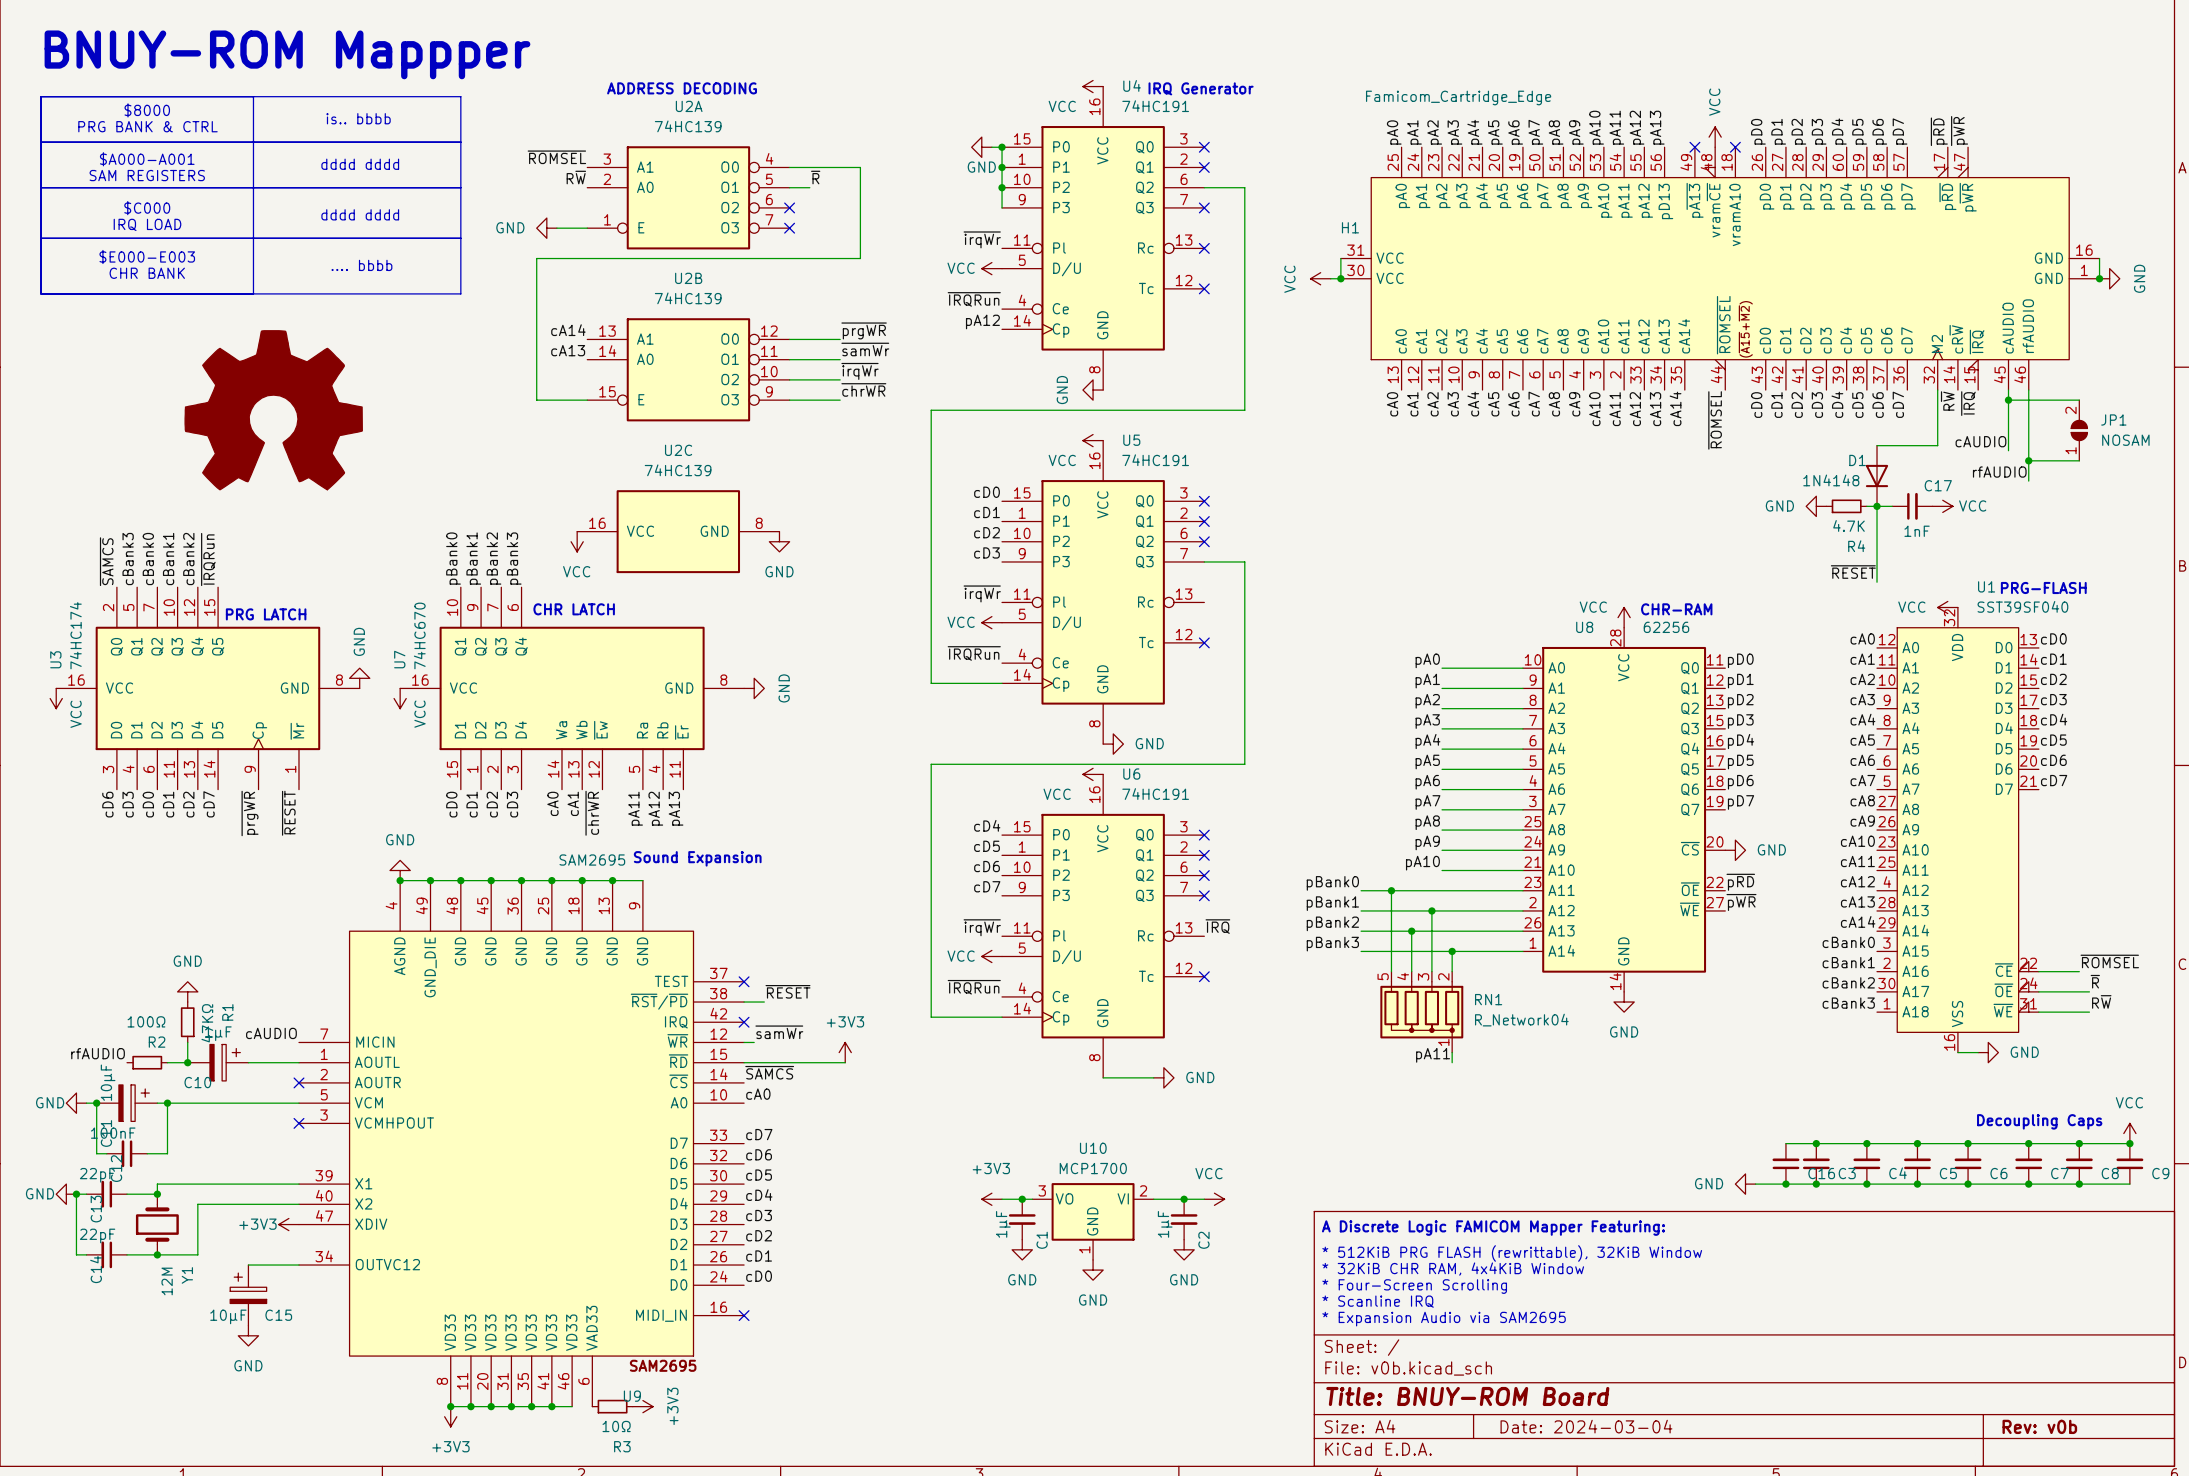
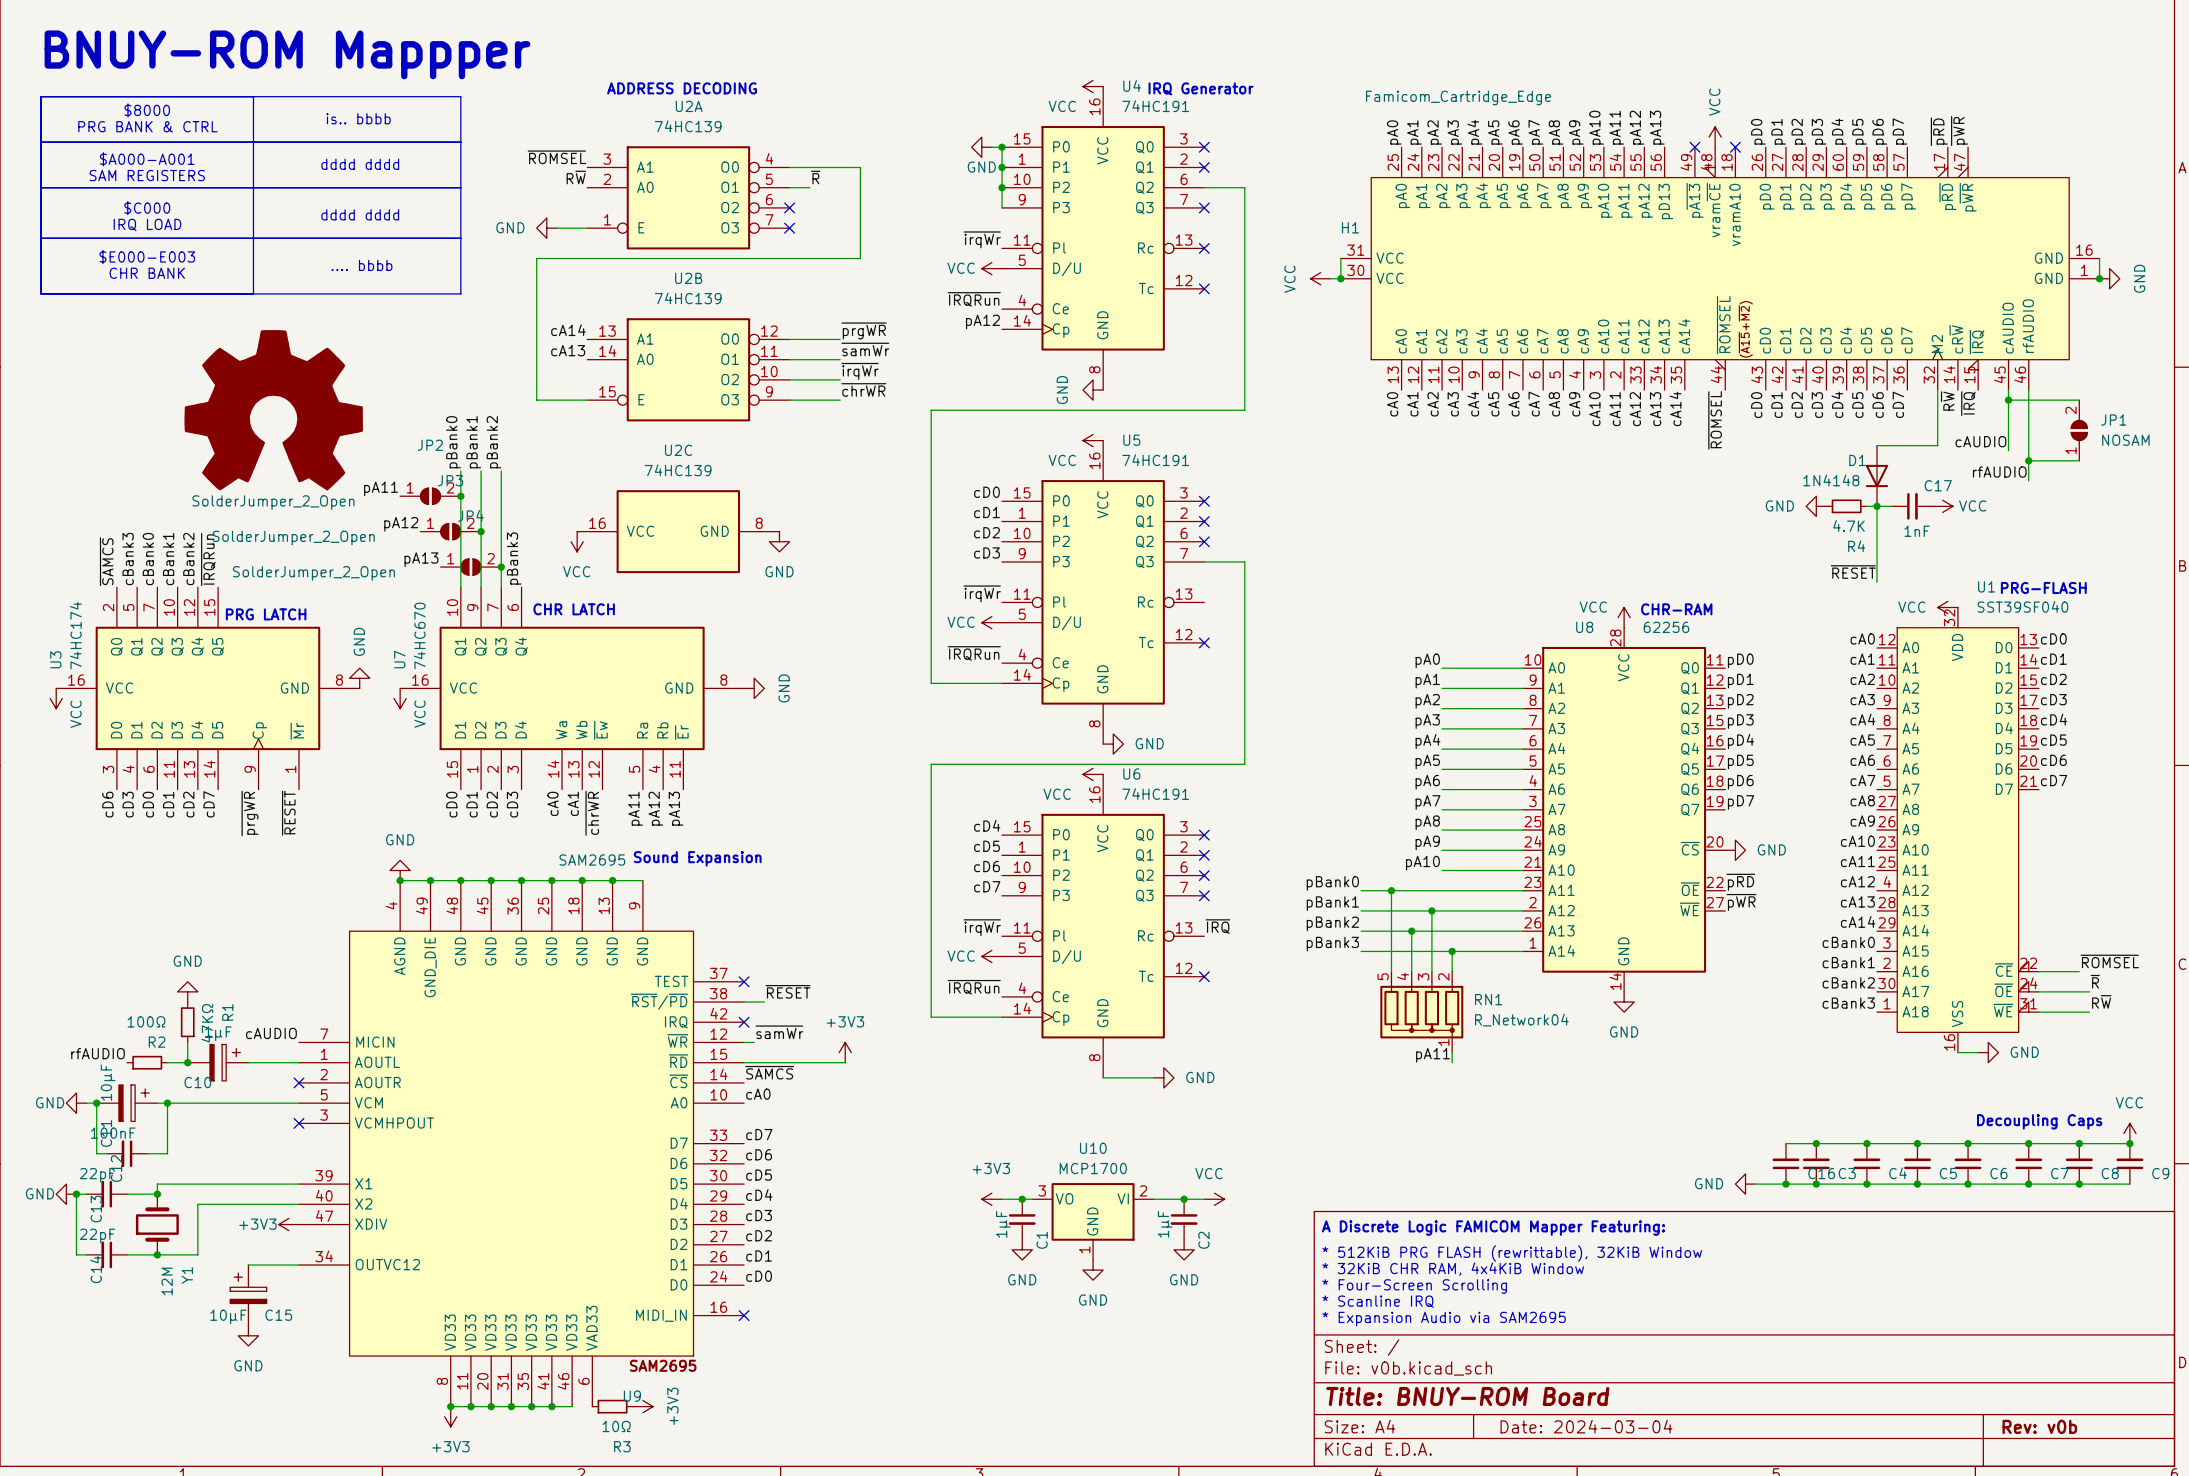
wire: none -> (460, 470) (460, 587)
wire: none -> (481, 470) (481, 587)
wire: none -> (501, 470) (501, 587)
label: none -> pA11 (381, 488)
JP2: none -> SolderJumper_2_Open (430, 496)
junction: none -> (460, 496)
label: none -> pA12 (401, 524)
JP3: none -> SolderJumper_2_Open (450, 531)
junction: none -> (481, 531)
label position: pBank0 (453, 558) -> pBank0 (453, 442)
label position: pBank1 (473, 558) -> pBank1 (473, 442)
label position: pBank2 (493, 558) -> pBank2 (493, 442)
label: none -> pA13 (421, 559)
JP4: none -> SolderJumper_2_Open (470, 567)
junction: none -> (501, 567)

